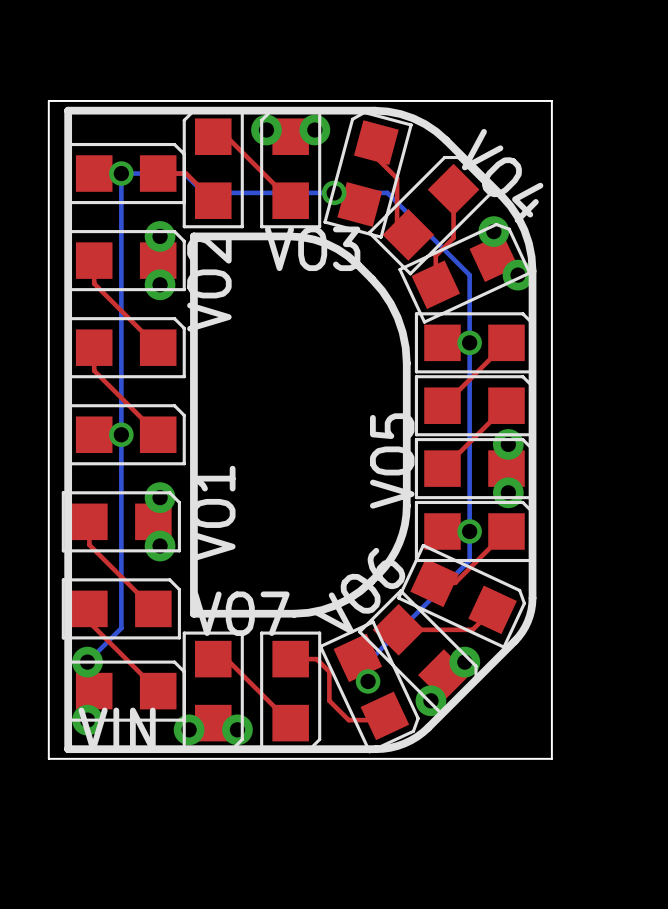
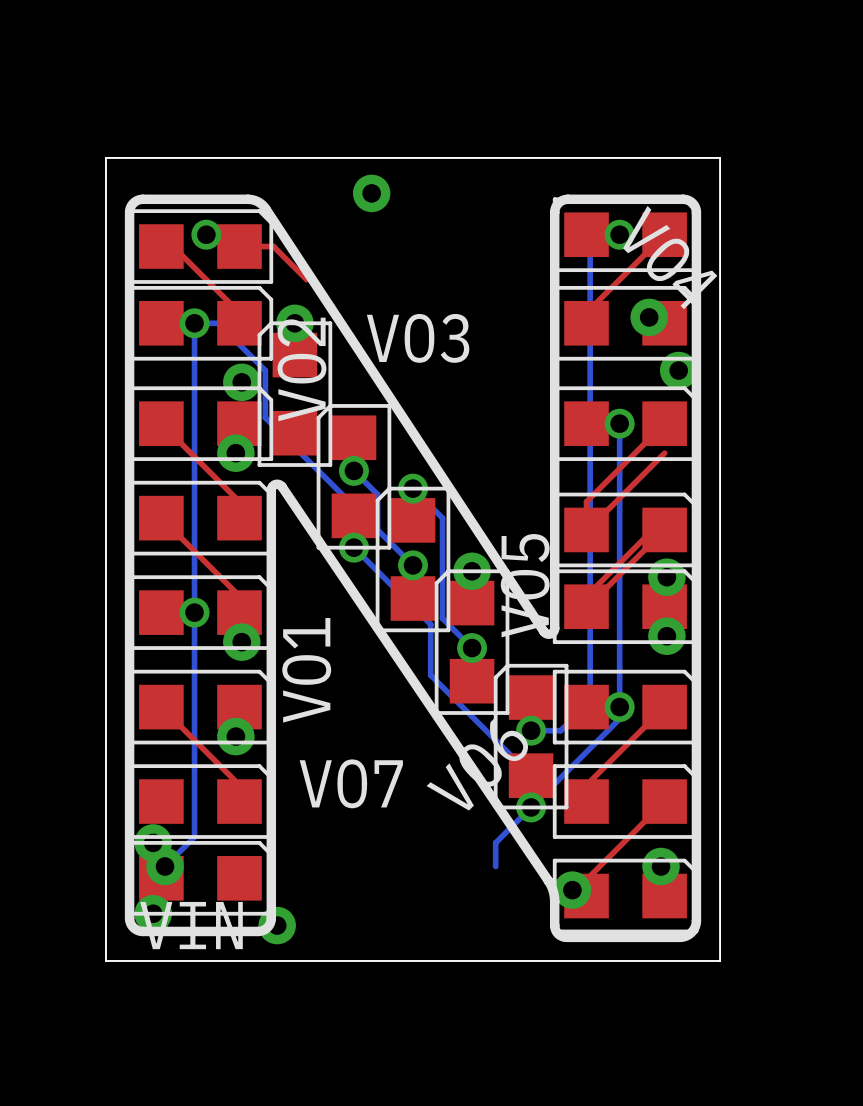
part: (314, 130) -> none
top track: (213, 136) (226, 136) (290, 200) -> none
top track: (376, 142) (376, 157) (397, 178) (397, 223) (408, 234) -> none
line: (68, 145) (68, 110) (374, 110) (400, 114) (425, 124) (436, 131) (510, 205) (524, 230) (531, 257) (532, 271) -> (129, 212) (133, 203) (142, 199) (248, 199) (262, 204) (543, 631) (547, 634) (552, 632) (554, 628) (554, 212) (559, 202) (567, 199) (683, 199) (693, 204) (696, 212) (696, 365)
top track: none -> (161, 234) (239, 312) (239, 323)
bottom track: none -> (619, 234) (590, 234) (590, 701) (560, 730) (531, 730)
via: none -> (619, 234)
part: none -> (625, 234)
top track: none -> (664, 234) (586, 312) (586, 323)
part: (213, 168) -> none
part: (290, 168) -> none
via position: (121, 173) -> (206, 234)
part: (368, 174) -> none
top track: (453, 189) (453, 237) (435, 255) (435, 284) -> none
via: (334, 192) -> none
part: (430, 215) -> none
bottom track: (121, 236) (121, 173) (184, 173) (203, 192) (387, 192) (469, 275) (469, 318) -> (194, 323) (218, 323) (265, 370) (265, 417) (353, 506) (353, 547) (430, 624) (430, 675) (531, 775) (531, 807)
via: none -> (194, 323)
part position: (160, 236) -> (294, 323)
line: (193, 236) (193, 613) (294, 613) (308, 612) (335, 605) (360, 591) (384, 567) (395, 551) (404, 524) (406, 505) (406, 363) (405, 347) (397, 317) (382, 290) (371, 278) (348, 256) (326, 243) (314, 239) (289, 236) (193, 236) -> none
part: none -> (625, 323)
top track: (94, 260) (94, 283) (158, 347) -> none
part position: (126, 260) -> (200, 323)
part: (464, 273) -> none
part: none -> (294, 394)
top track: none -> (161, 423) (239, 501) (239, 518)
part: none -> (200, 423)
top track: none -> (664, 423) (586, 501) (586, 518)
part: none -> (235, 453)
via position: (469, 342) -> (619, 423)
part position: (474, 342) -> (625, 423)
top track: (94, 347) (94, 370) (158, 434) -> none
part: (126, 347) -> none
bottom track: none -> (353, 470) (377, 494) (377, 529) (413, 565)
via: none -> (353, 470)
part: none -> (353, 476)
bottom track: none -> (413, 488) (442, 518) (442, 618) (472, 648)
via: none -> (413, 488)
top track: none -> (161, 518) (239, 596) (239, 612)
part: none -> (200, 518)
top track: none -> (664, 518) (586, 596) (586, 612)
via: none -> (353, 547)
part: none -> (413, 559)
via position: (121, 434) -> (194, 612)
part: (126, 434) -> none
via: none -> (413, 565)
part: none -> (472, 571)
part: none -> (200, 612)
part: none -> (472, 642)
via: none -> (472, 648)
top track: (89, 521) (89, 544) (153, 608) -> none
part: (121, 521) -> none
via position: (469, 531) -> (619, 707)
part position: (474, 531) -> (625, 707)
top track: (506, 531) (455, 582) (434, 582) -> none
part position: (160, 546) -> (235, 736)
top track: none -> (161, 707) (239, 785) (239, 801)
part: none -> (200, 707)
top track: none -> (664, 707) (586, 785) (586, 801)
via: none -> (531, 730)
part: none -> (531, 736)
part: (461, 596) -> none
line: (532, 598) (527, 621) (514, 641) (422, 732) (397, 746) (376, 749) (68, 749) (68, 723) -> (696, 764) (696, 920) (692, 930) (686, 936) (679, 937) (566, 937) (560, 935) (555, 928) (554, 897) (548, 880) (282, 486) (275, 484) (271, 490) (270, 921) (267, 927) (259, 931) (142, 931) (133, 927) (129, 918)
top track: (89, 608) (89, 622) (158, 691) -> none
part position: (121, 608) -> (200, 801)
top track: (492, 609) (472, 629) (398, 629) -> none
bottom track: (121, 628) (87, 662) -> (194, 801) (194, 836) (165, 866)
part: none -> (625, 801)
top track: none -> (664, 801) (586, 879) (586, 896)
part: (417, 652) -> none
top track: (213, 659) (226, 659) (290, 723) -> none
top track: (290, 659) (316, 659) (329, 671) (329, 700) (348, 720) (380, 720) (384, 715) -> none
part position: (464, 662) -> (661, 866)
part: none -> (165, 866)
via position: (368, 681) -> (531, 807)
part: (369, 686) -> none
part: (213, 691) -> none
part: (290, 691) -> none
part: none -> (625, 896)
part: (237, 729) -> none

